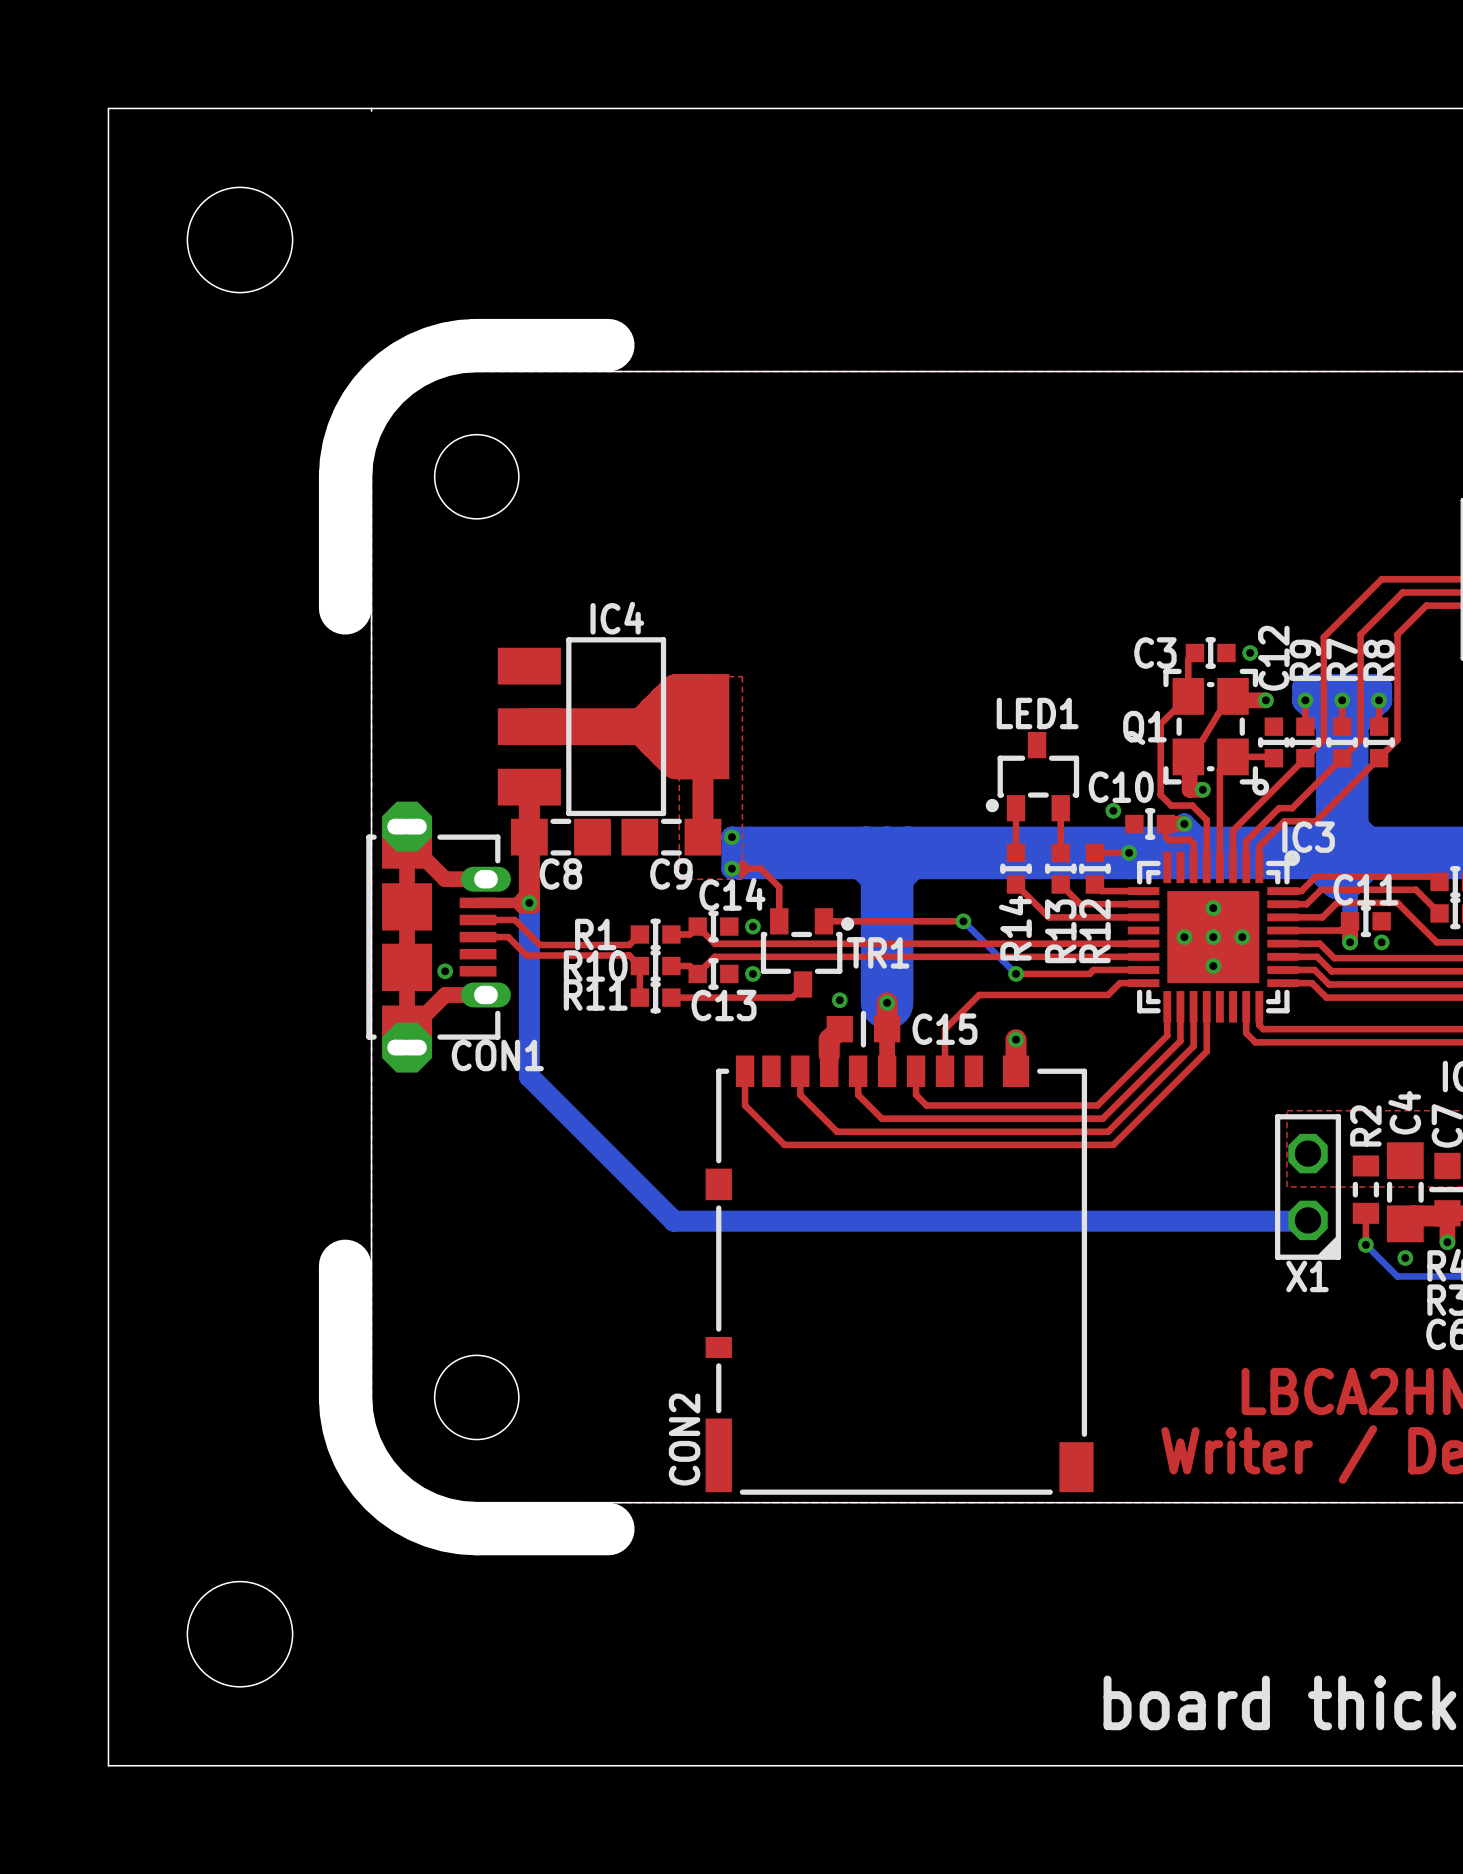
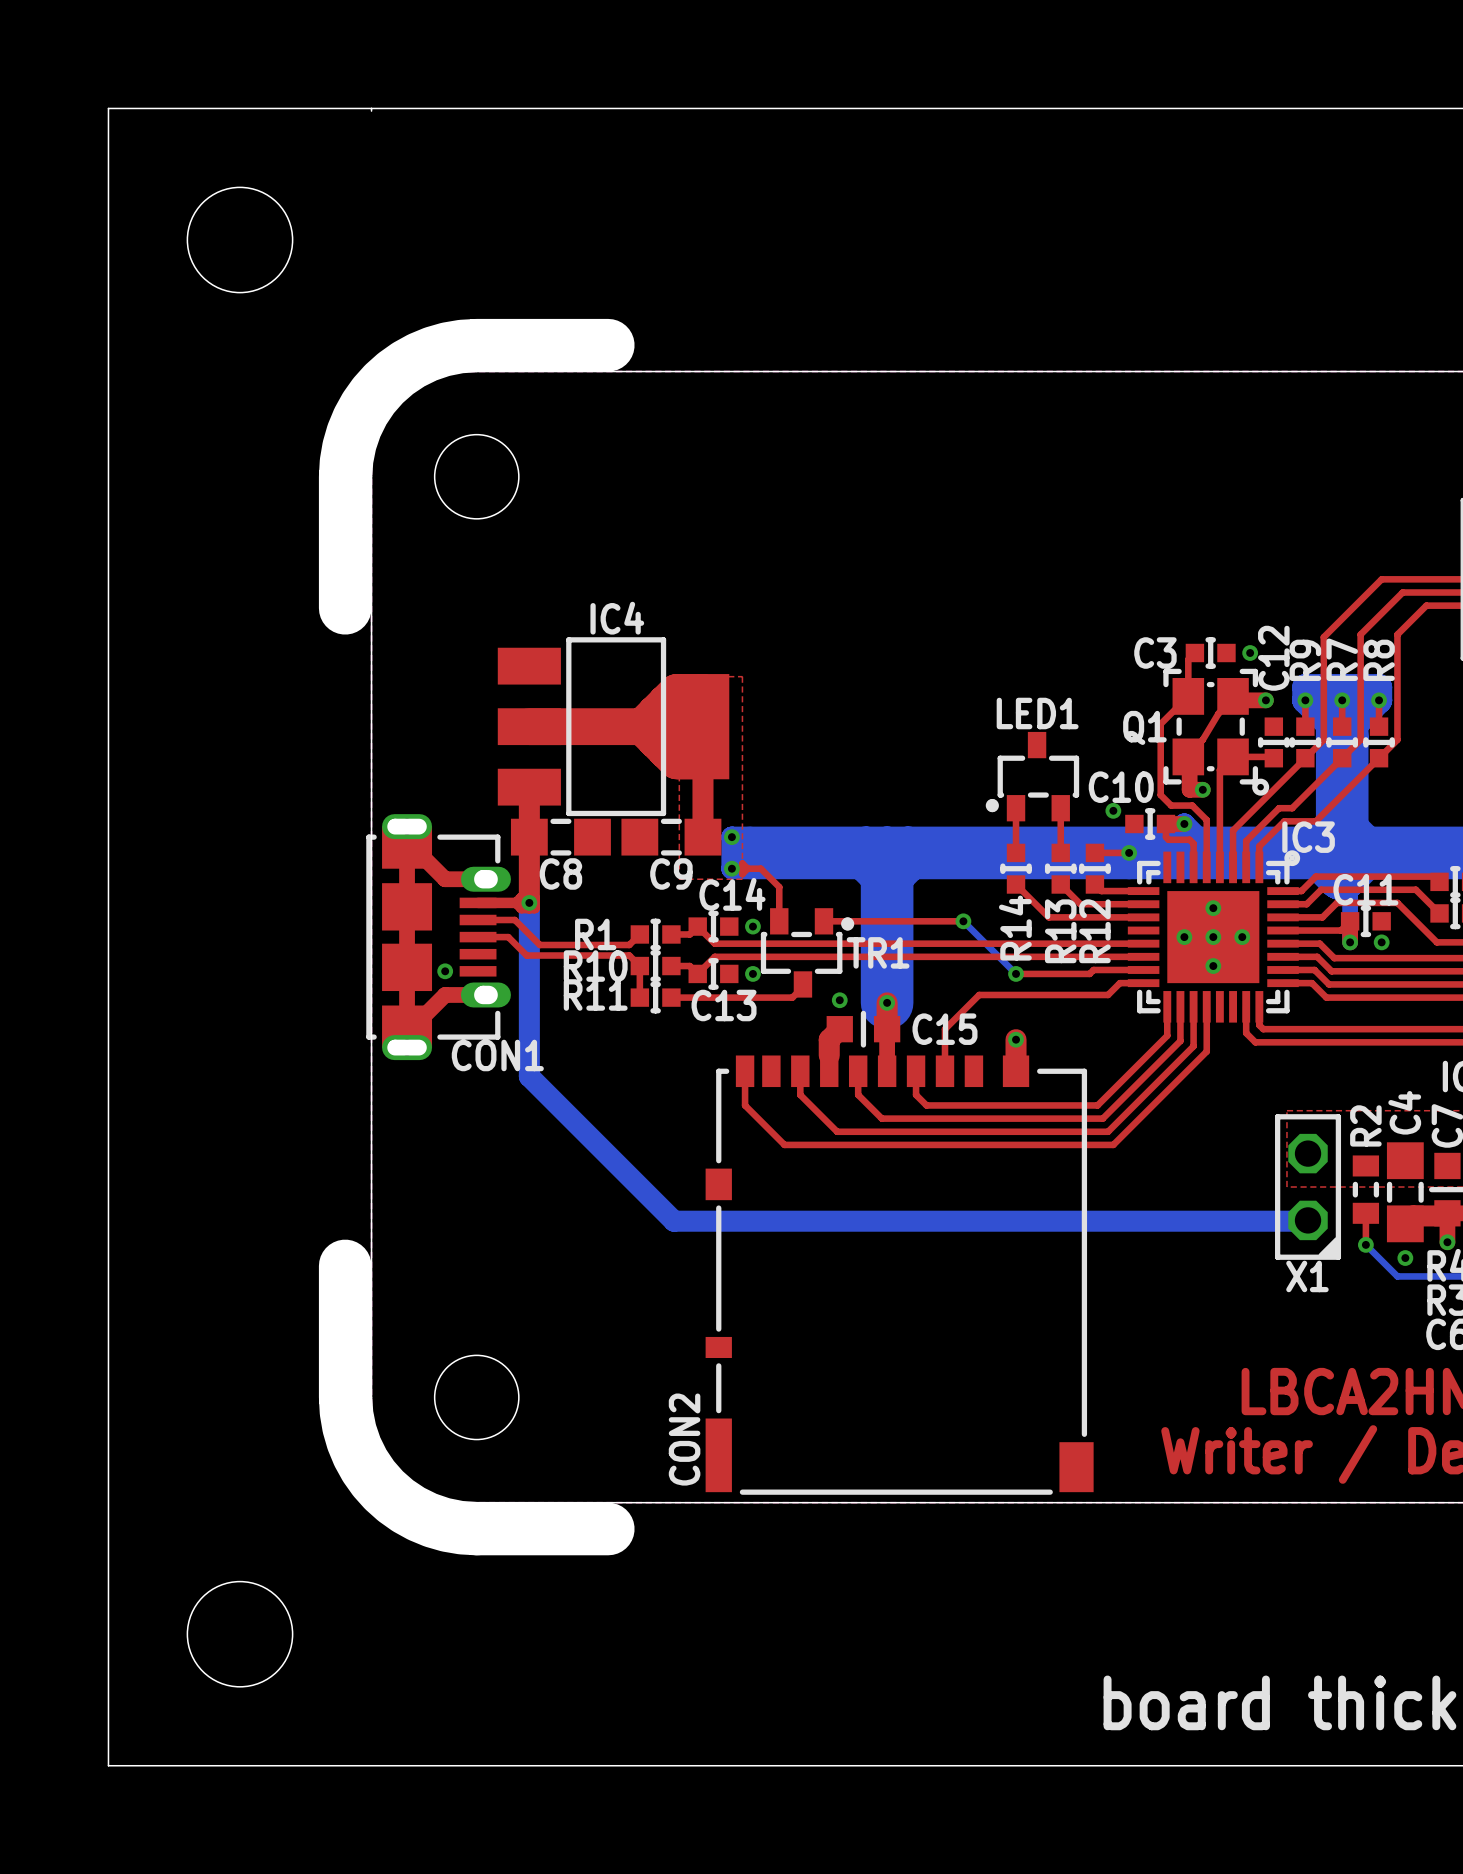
CON1 footprint: [366, 801, 511, 1073] -> [366, 814, 511, 1061]

